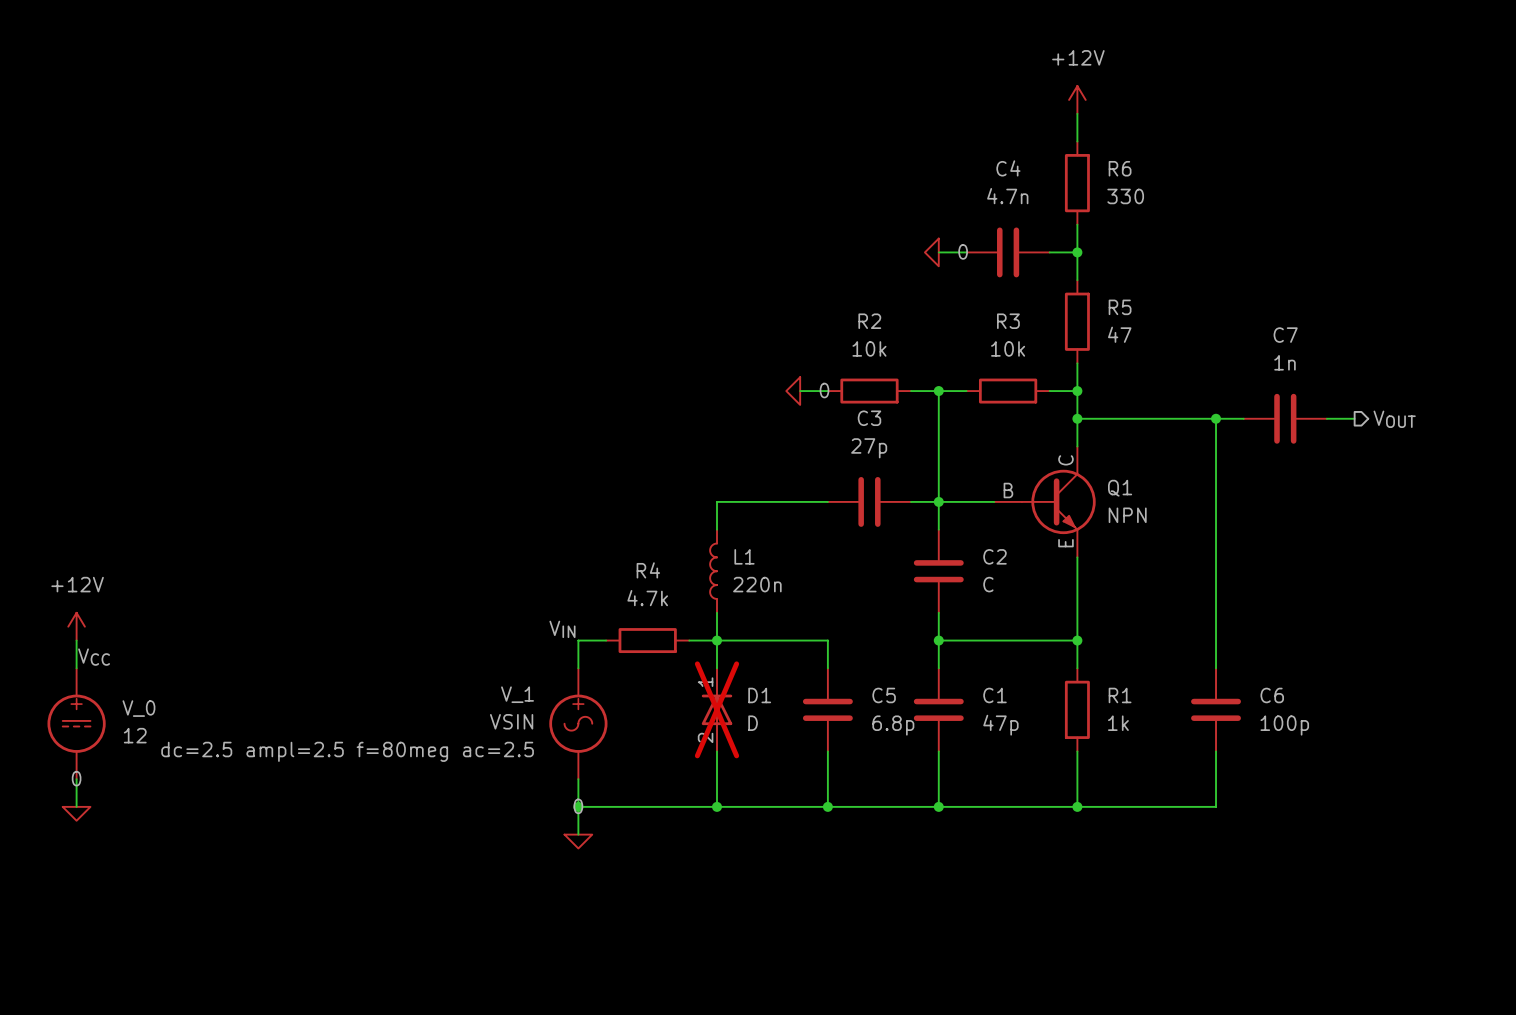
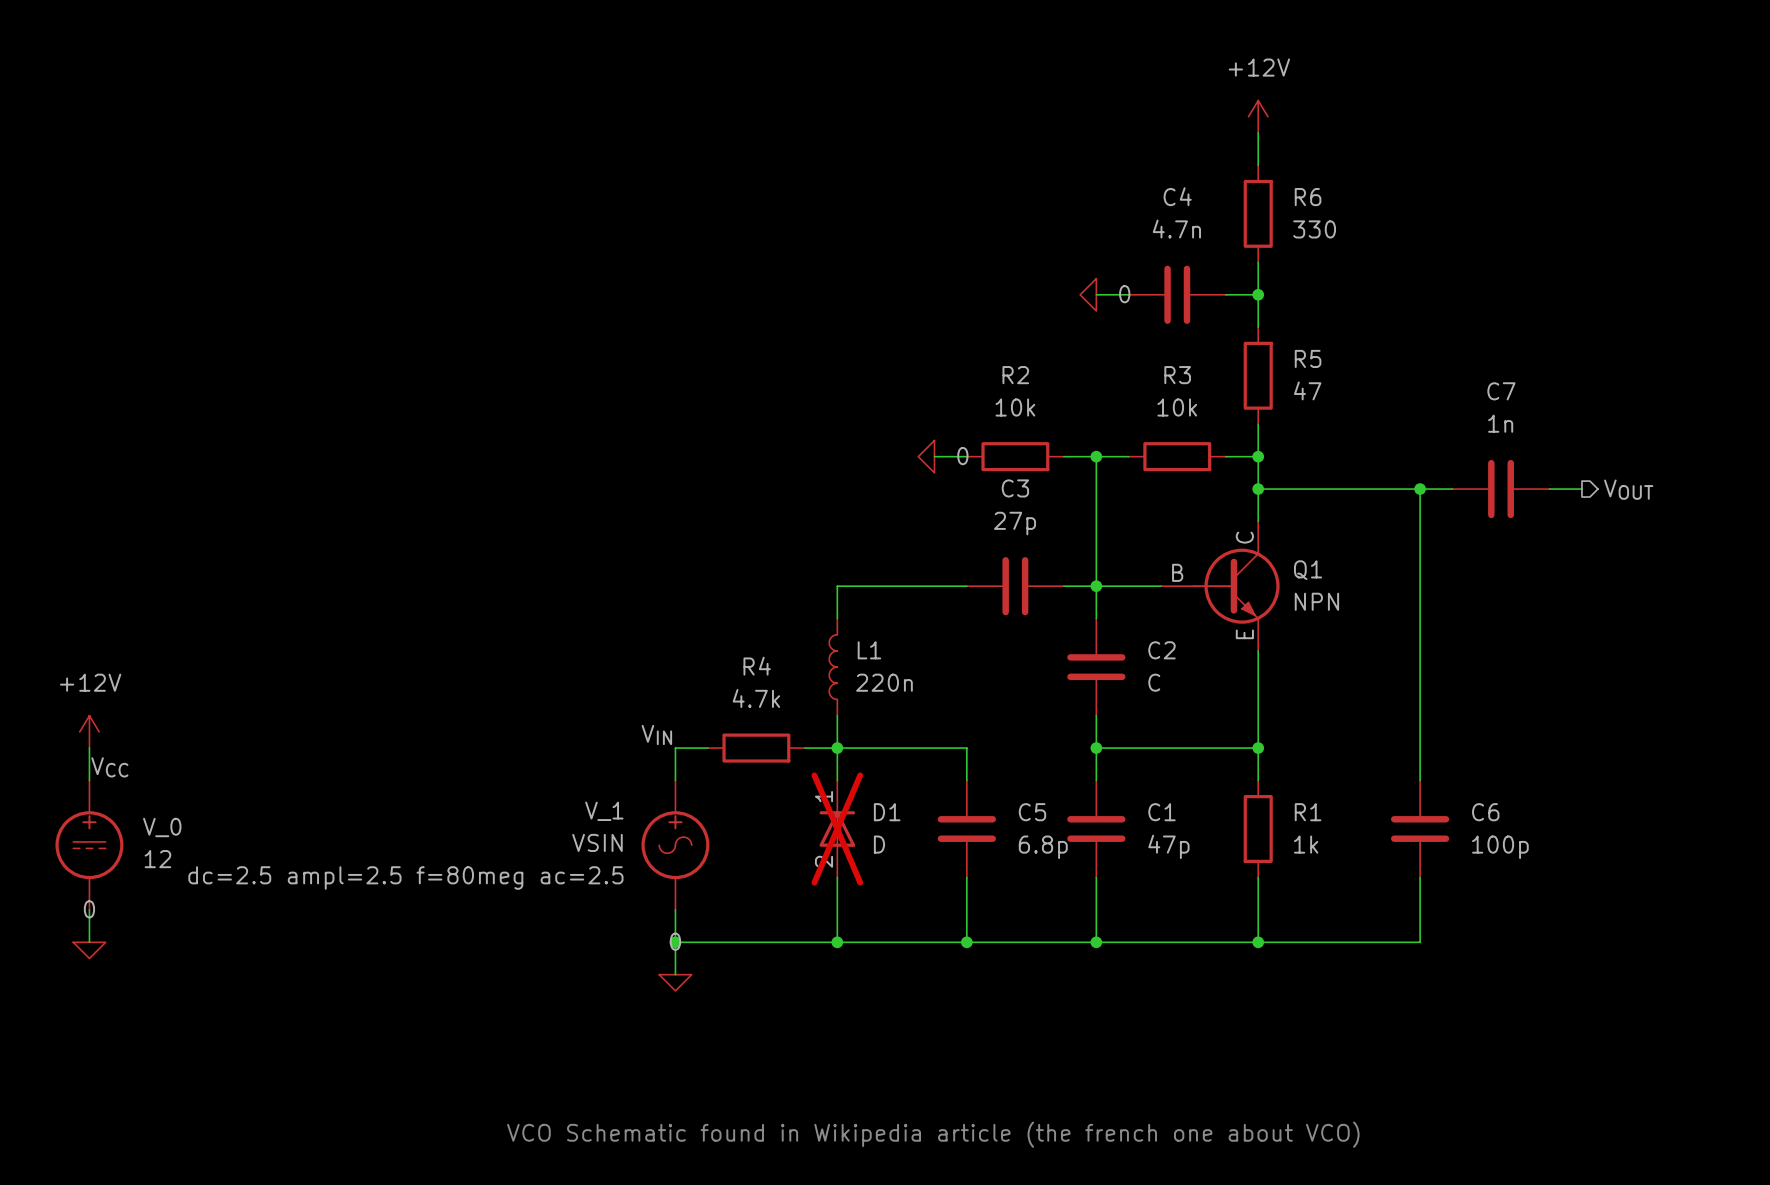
text: none -> VCO Schematic found in Wikipedia article (the french one about VCO) (933, 1134)

